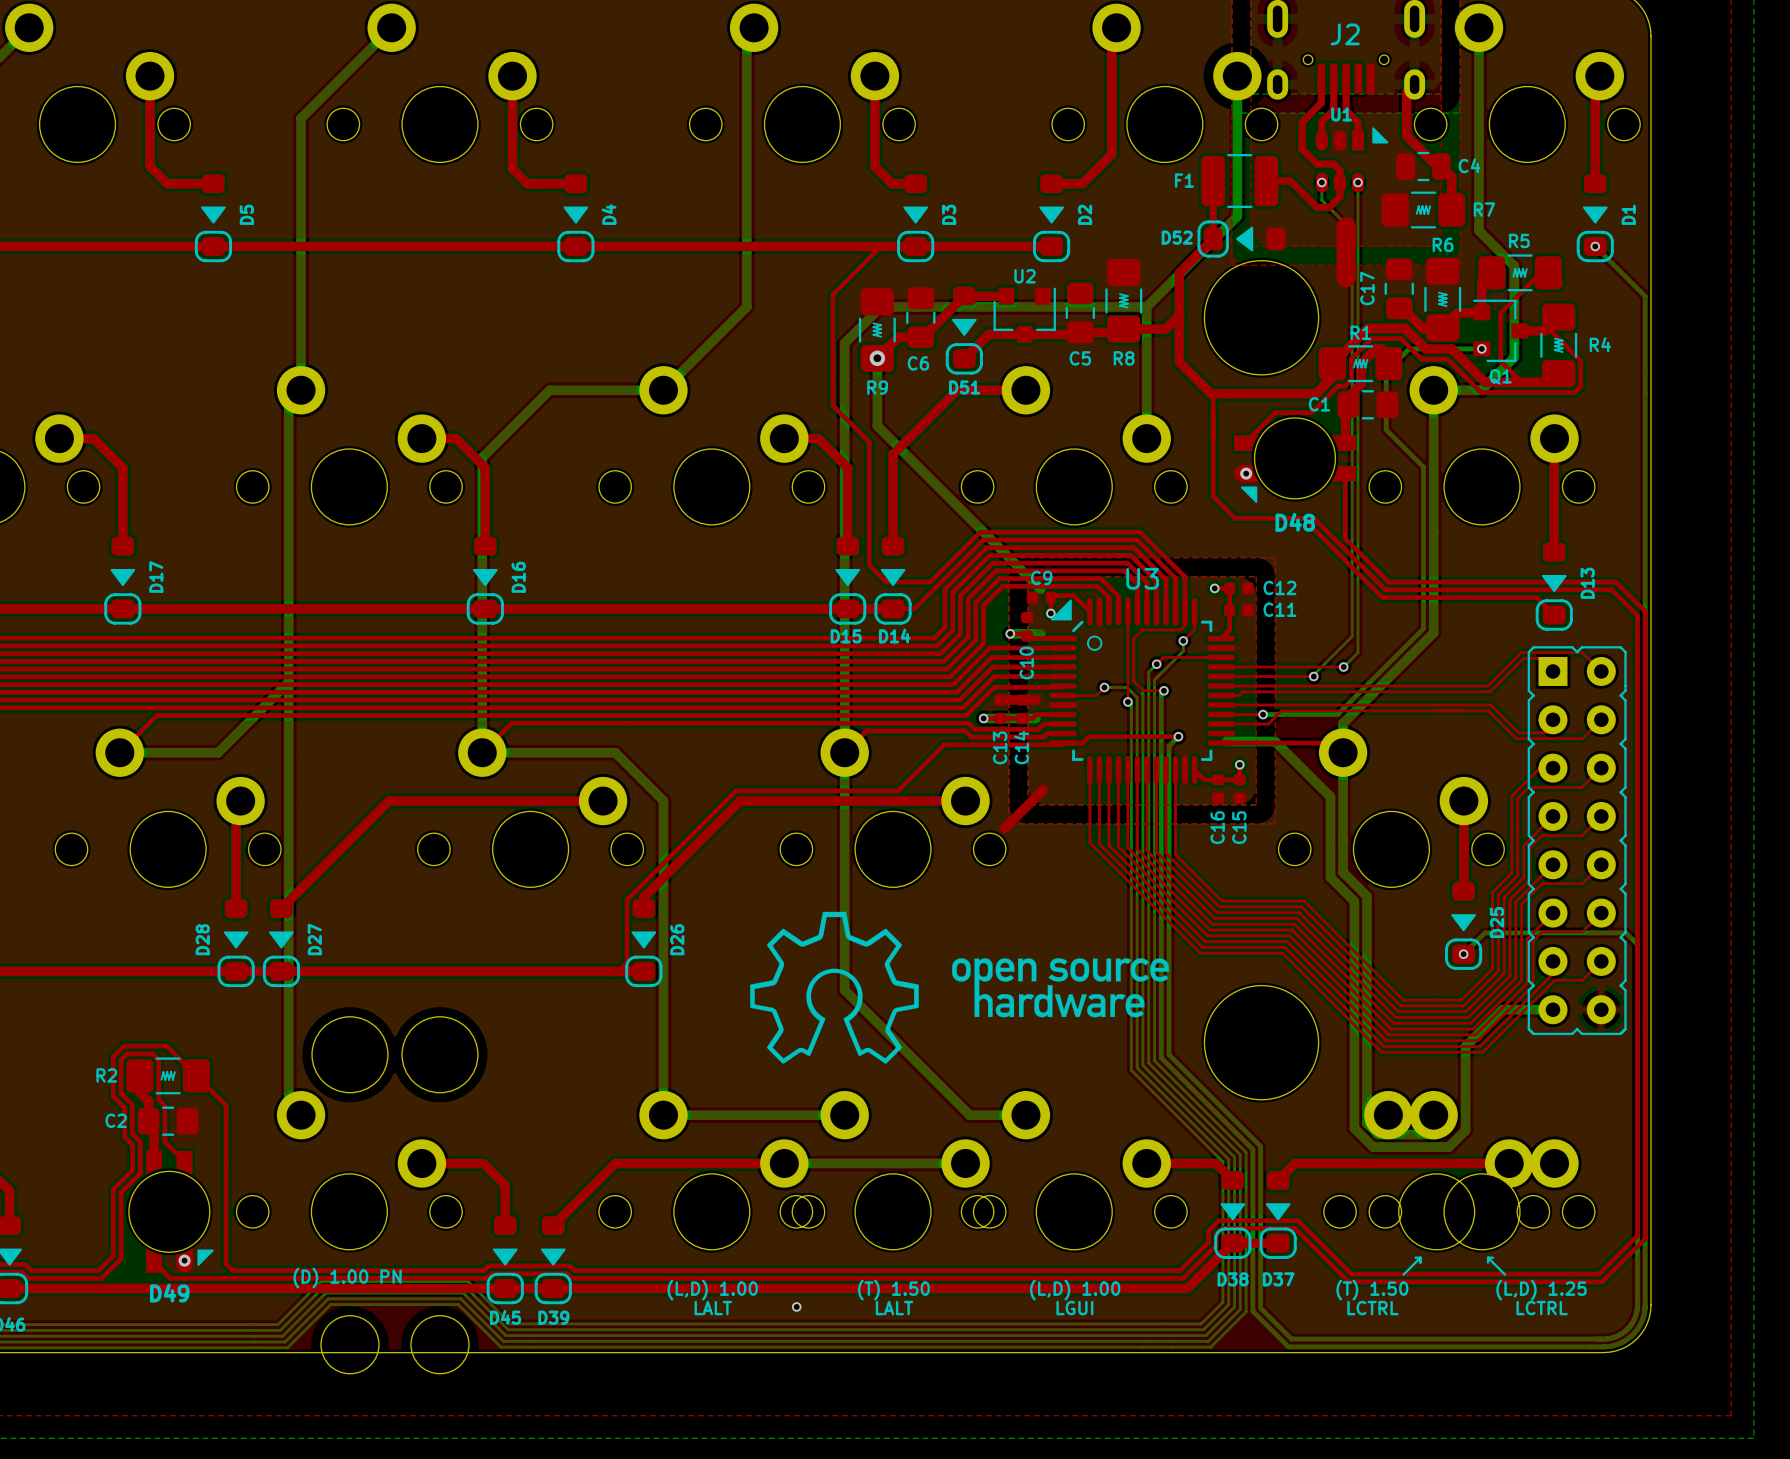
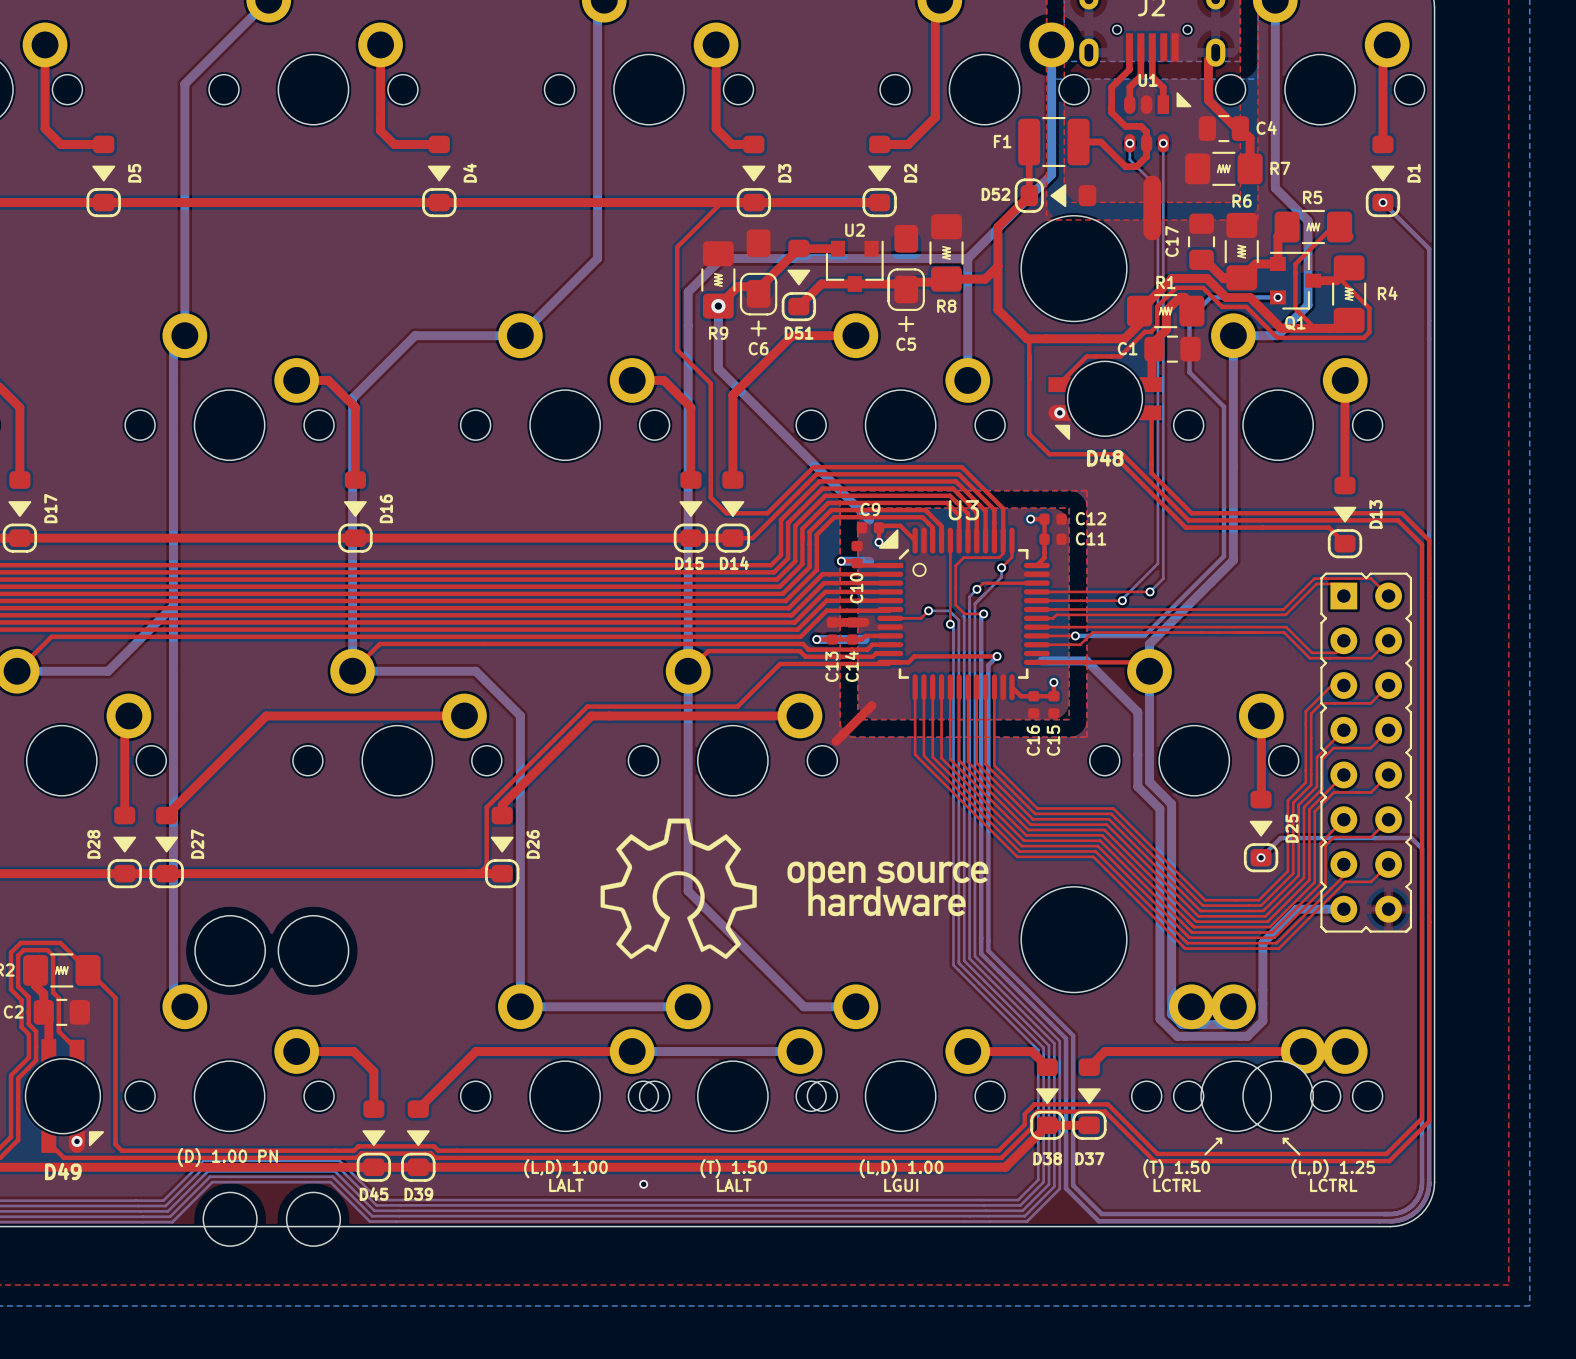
C5 footprint: [1065, 282, 1095, 344] -> [887, 224, 925, 333]
C6 footprint: [906, 287, 936, 349] -> [739, 229, 778, 337]

